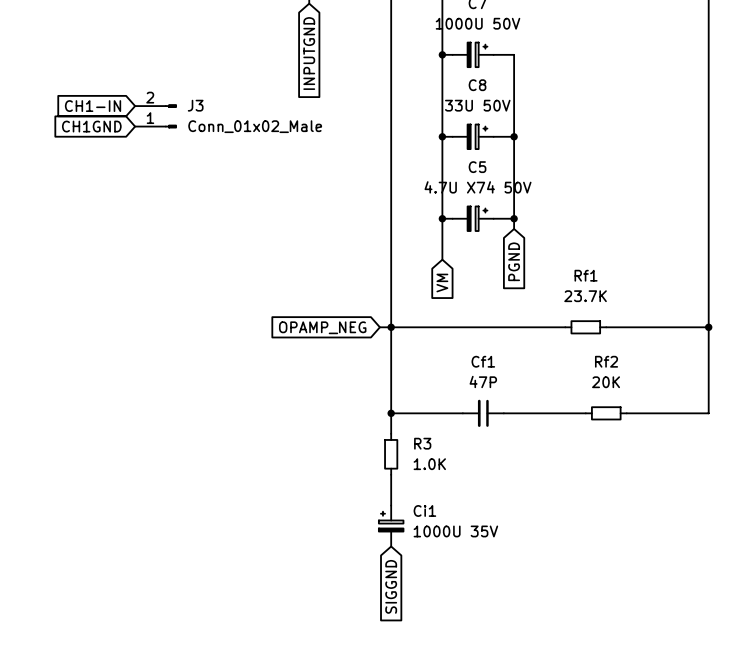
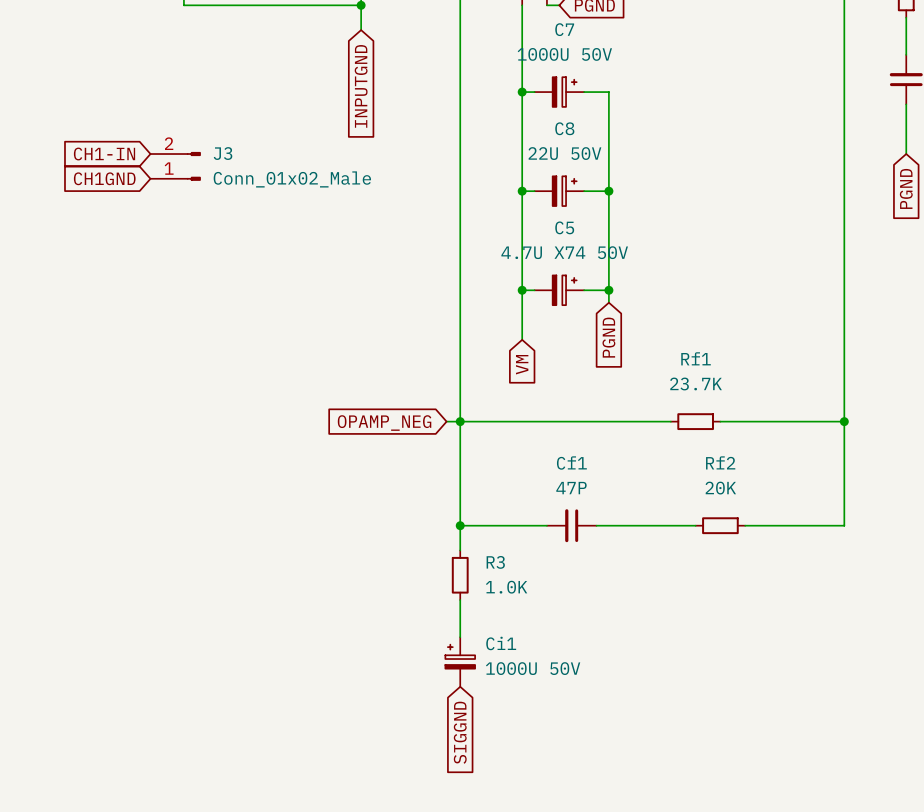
C8 value: 33U 50V (477, 105) -> 22U 50V (564, 153)
Ci1 value: 1000U 35V (455, 531) -> 1000U 50V (533, 668)

